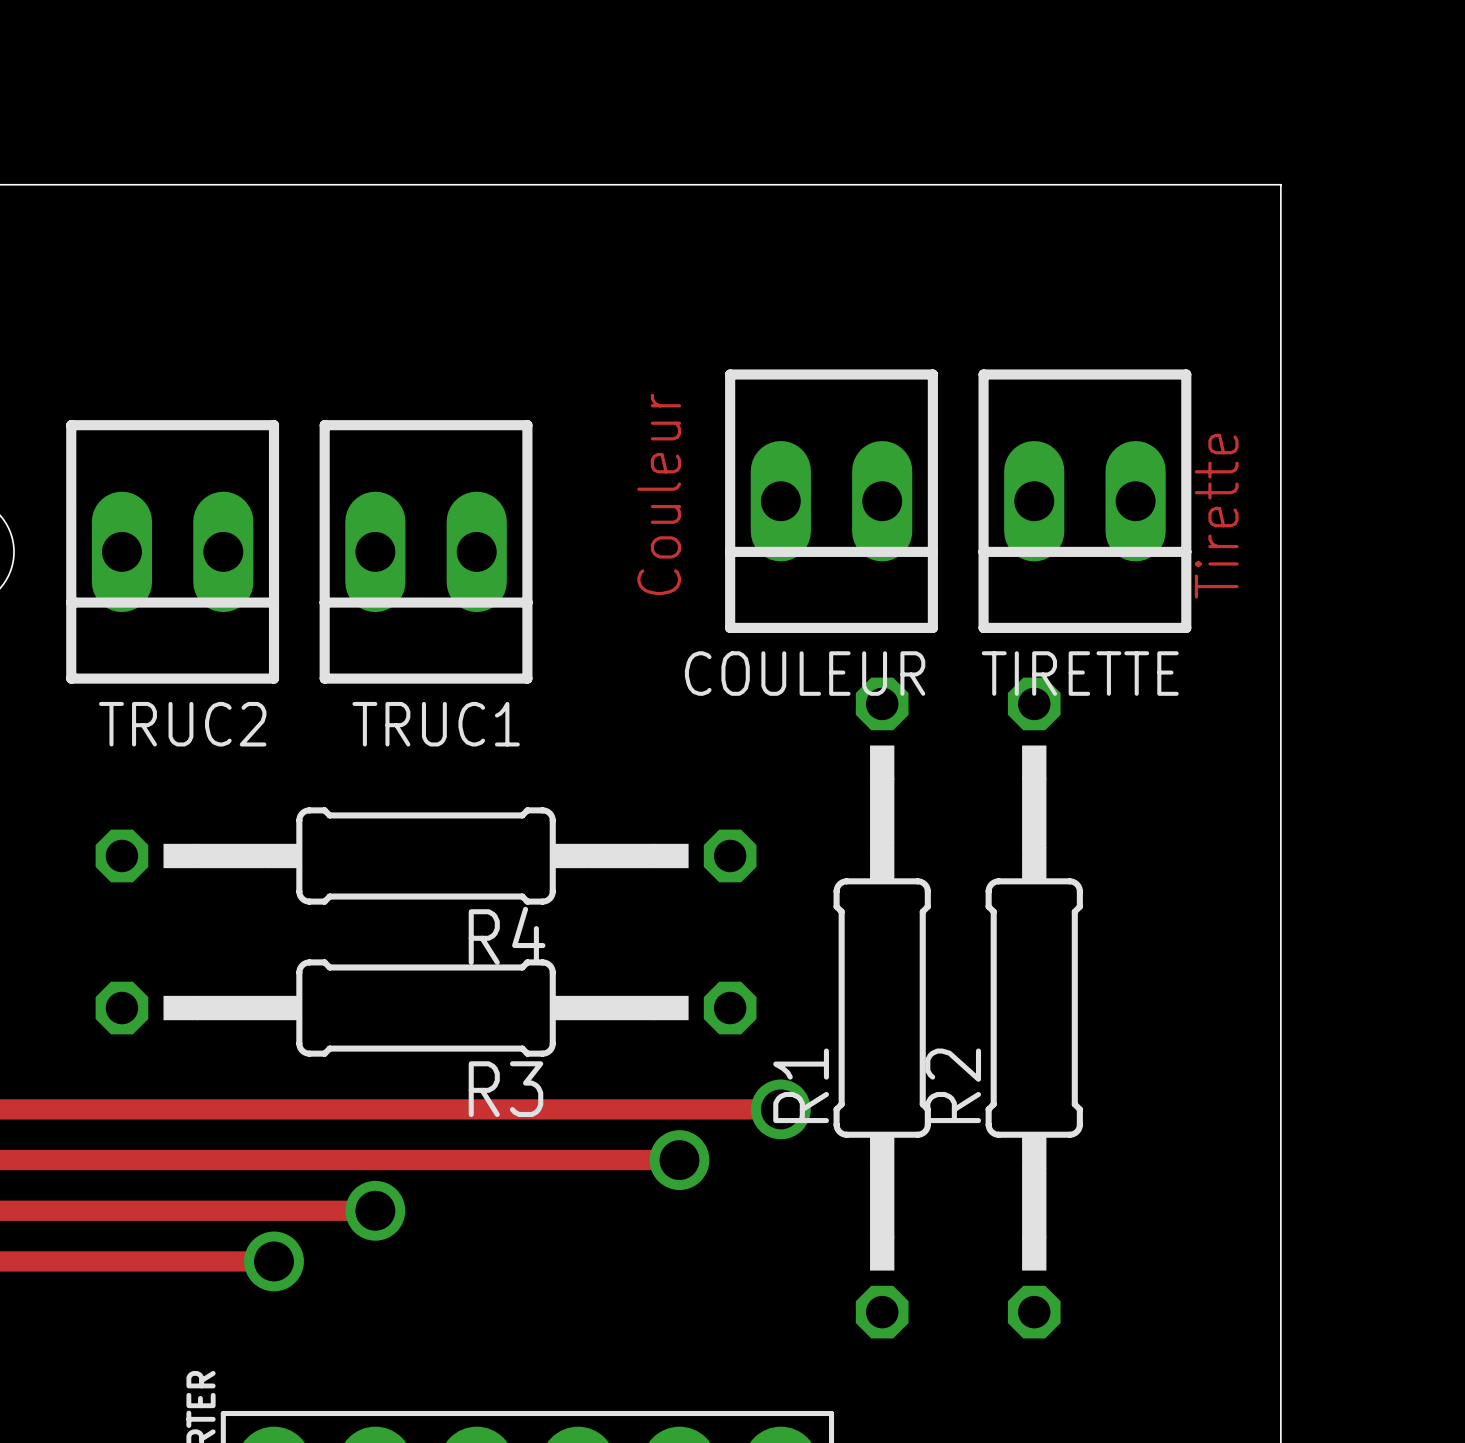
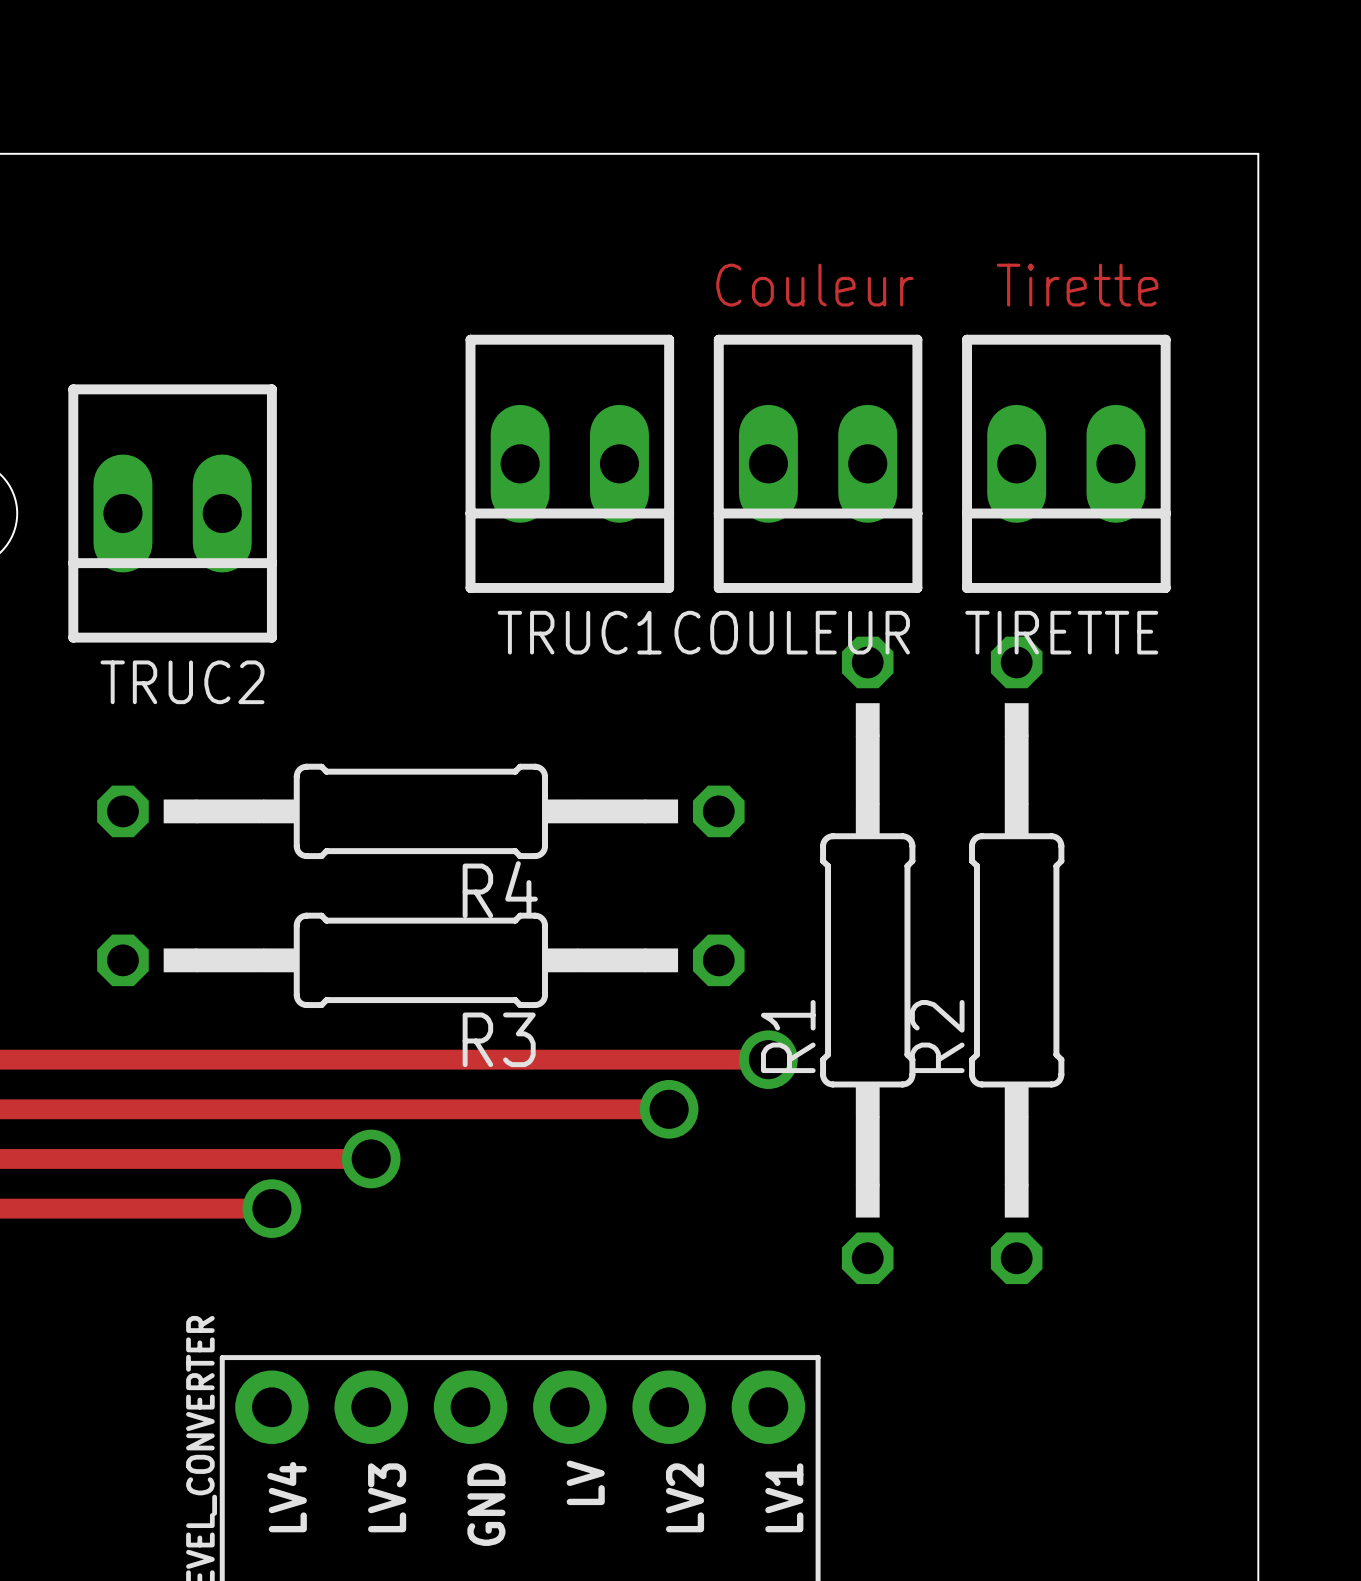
text rotation: 0° (659, 494) -> 90° clockwise (814, 285)
text rotation: 0° (1216, 516) -> 90° clockwise (1077, 285)
TRUC1 position: (426, 551) -> (569, 463)

